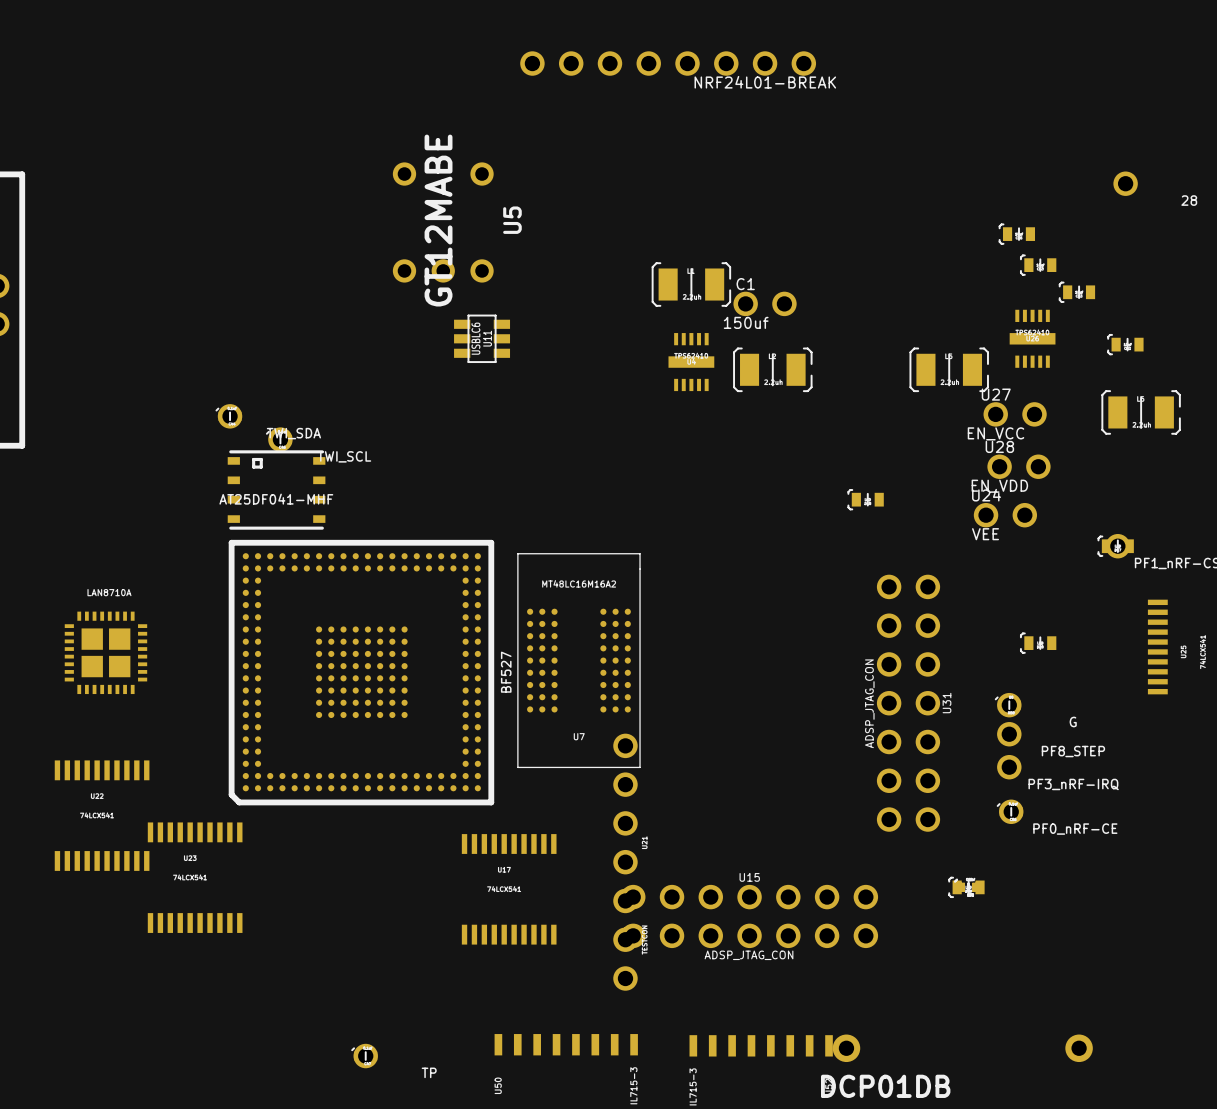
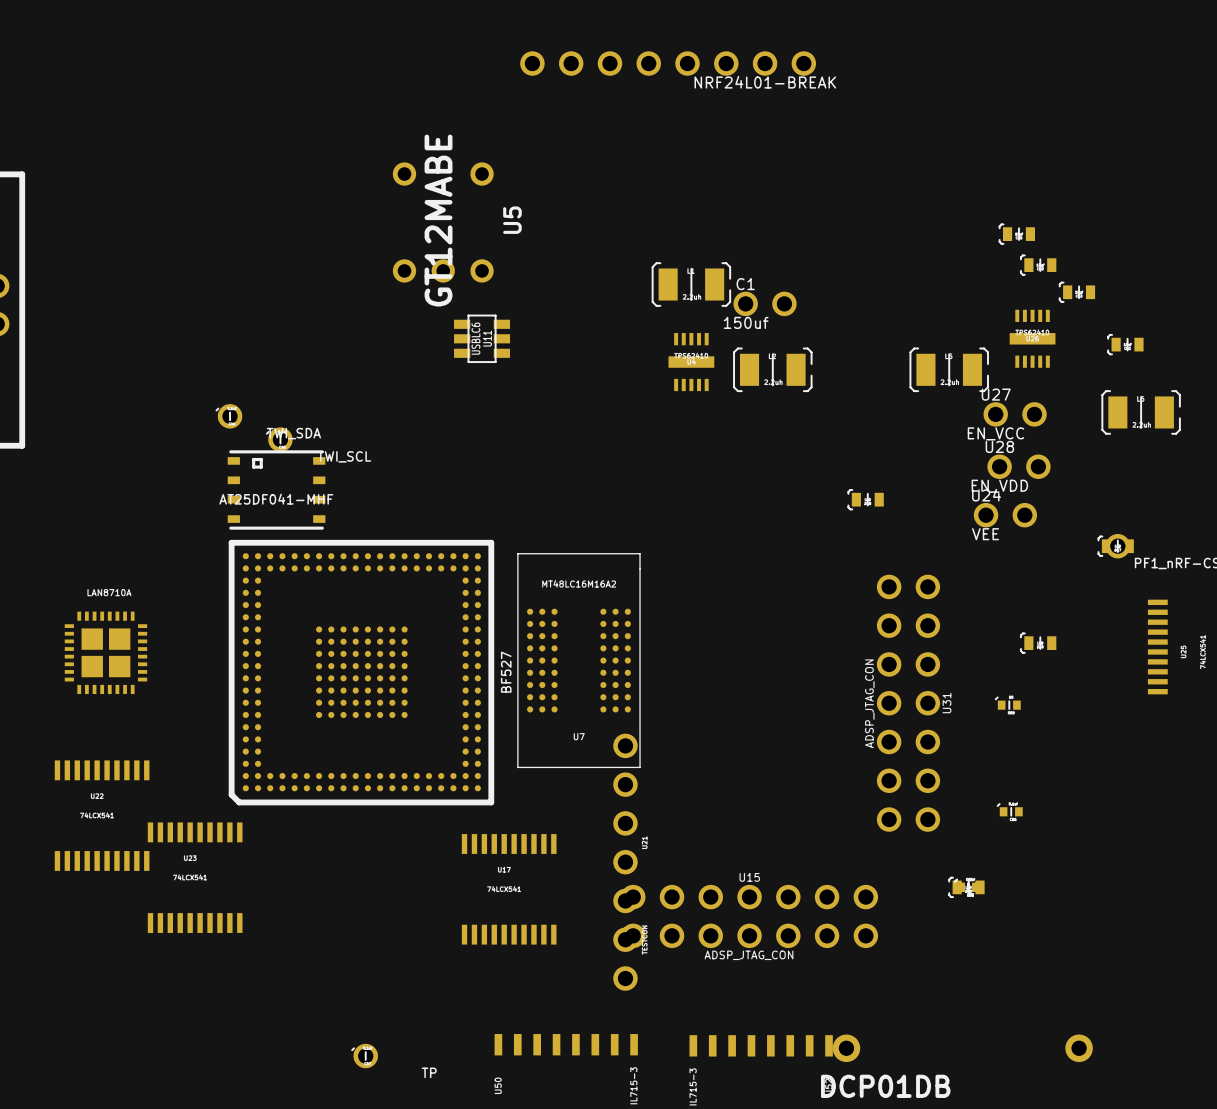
part: 28 (1125, 183) -> none
part: G (1009, 705) -> none
part: PF8_STEP (1009, 734) -> none
part: PF3_nRF-IRQ (1009, 767) -> none
part: PF0_nRF-CE (1011, 811) -> none

